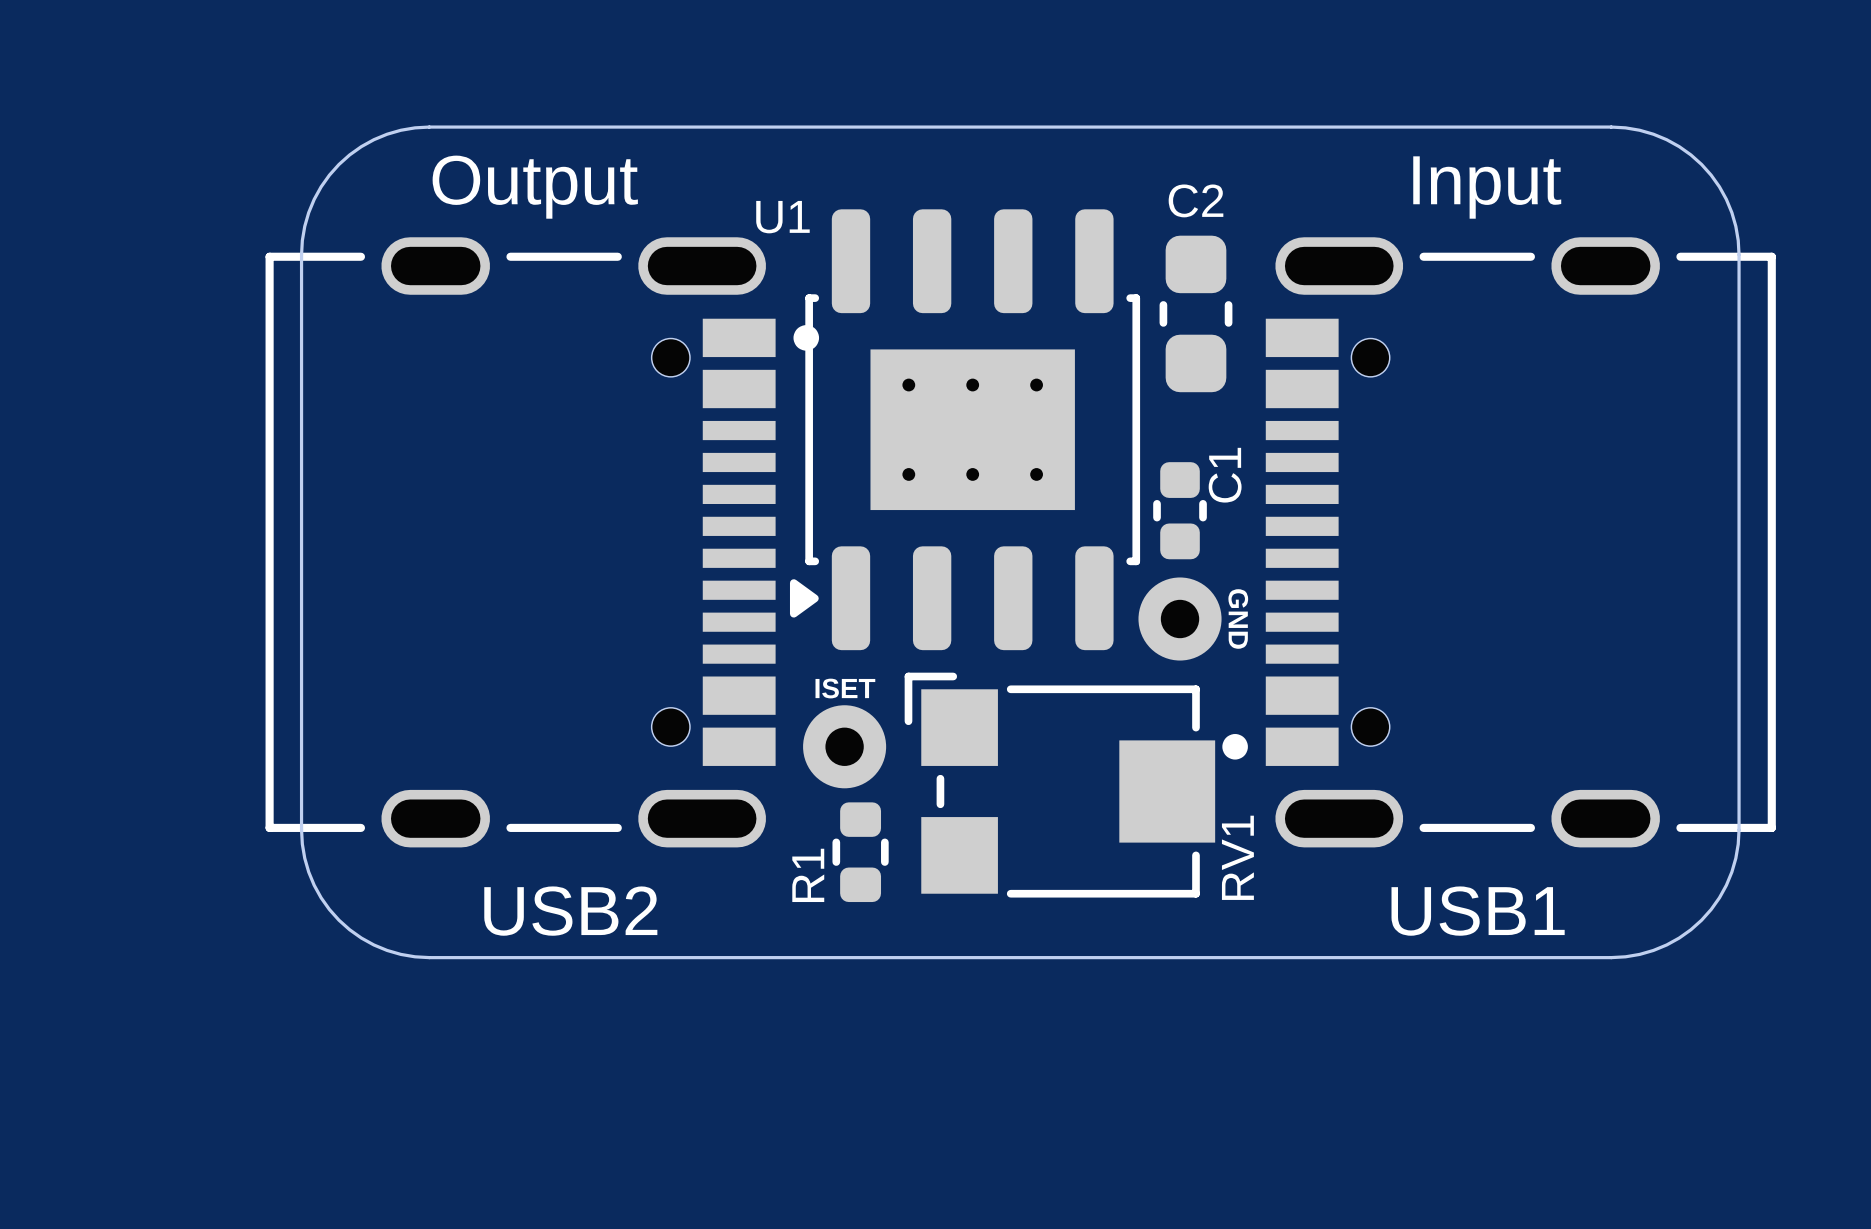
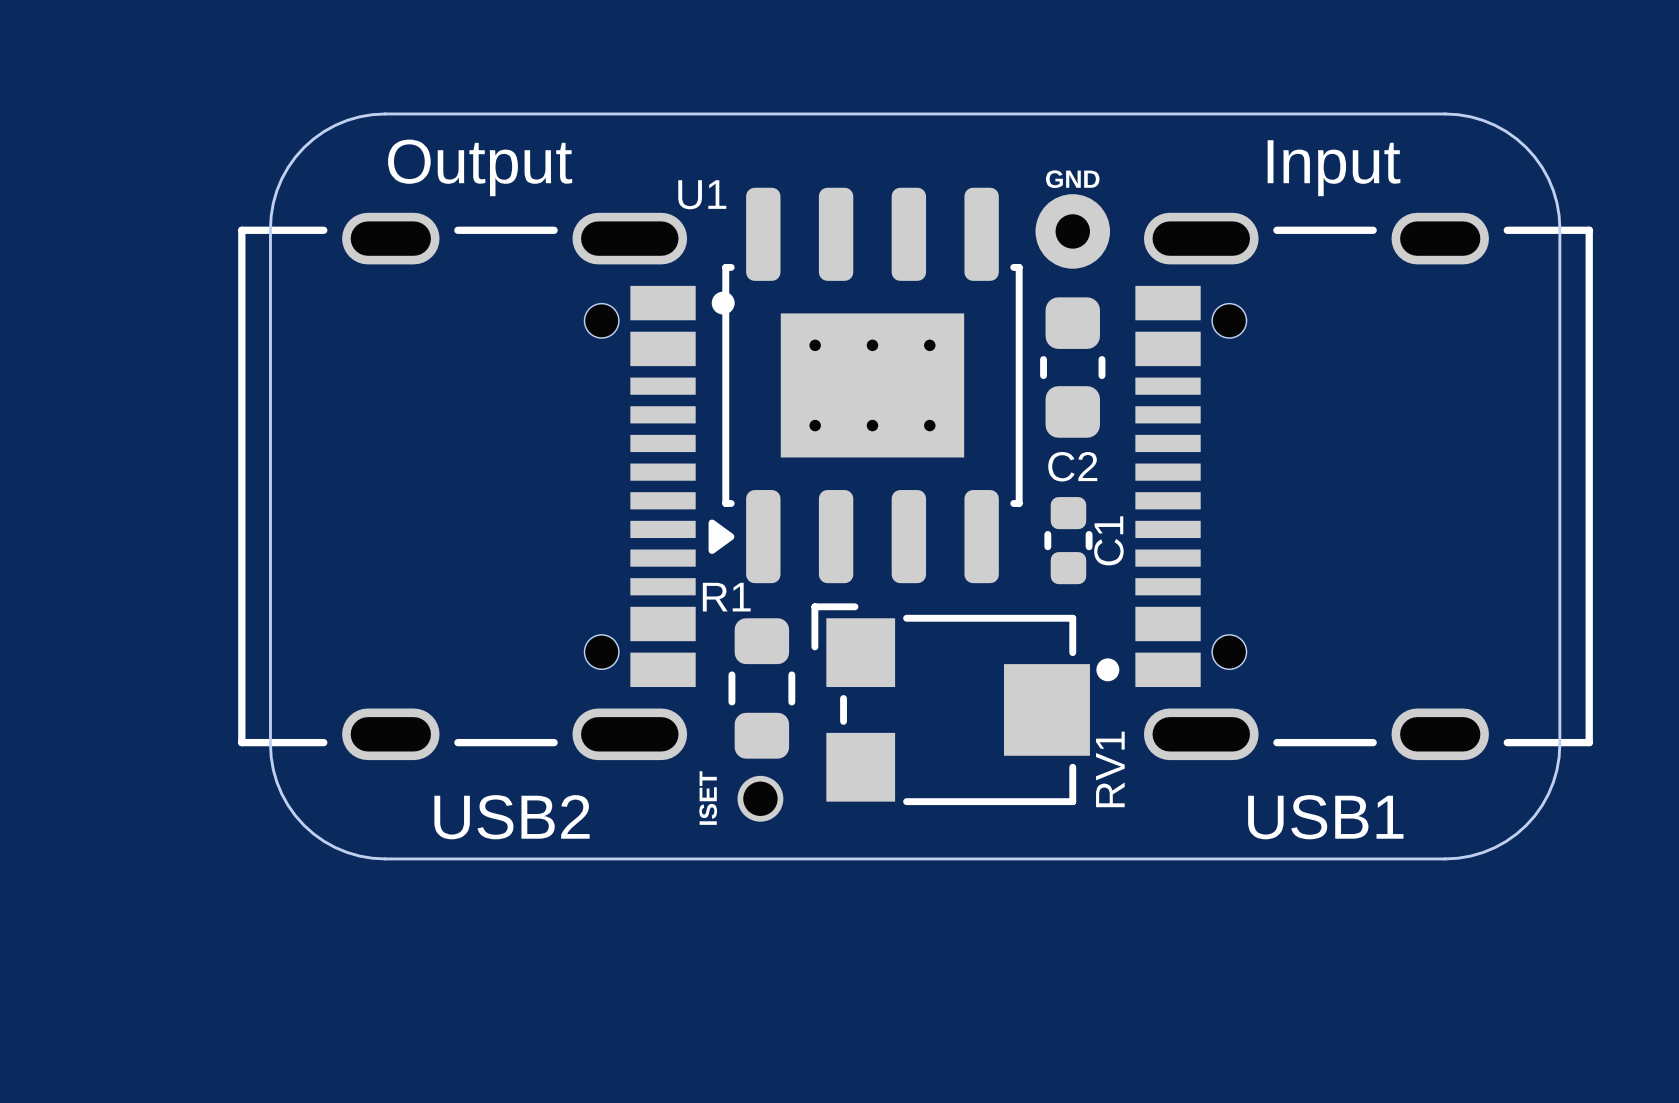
C2 name position: C2 (1196, 200) -> C2 (1072, 466)
C2 position: (1195, 313) -> (1072, 367)
C1 name position: C1 (1225, 475) -> C1 (1108, 540)
C1 position: (1180, 510) -> (1068, 540)
part value rotation: 0° (1238, 618) -> 90° counterclockwise (1072, 179)
part value position: GND (1238, 618) -> GND (1072, 179)
part position: (1180, 619) -> (1072, 231)
part: ISET (844, 746) -> none
R1 footprint: [832, 802, 889, 903] -> [728, 618, 796, 759]
part: none -> ISET (760, 798)

